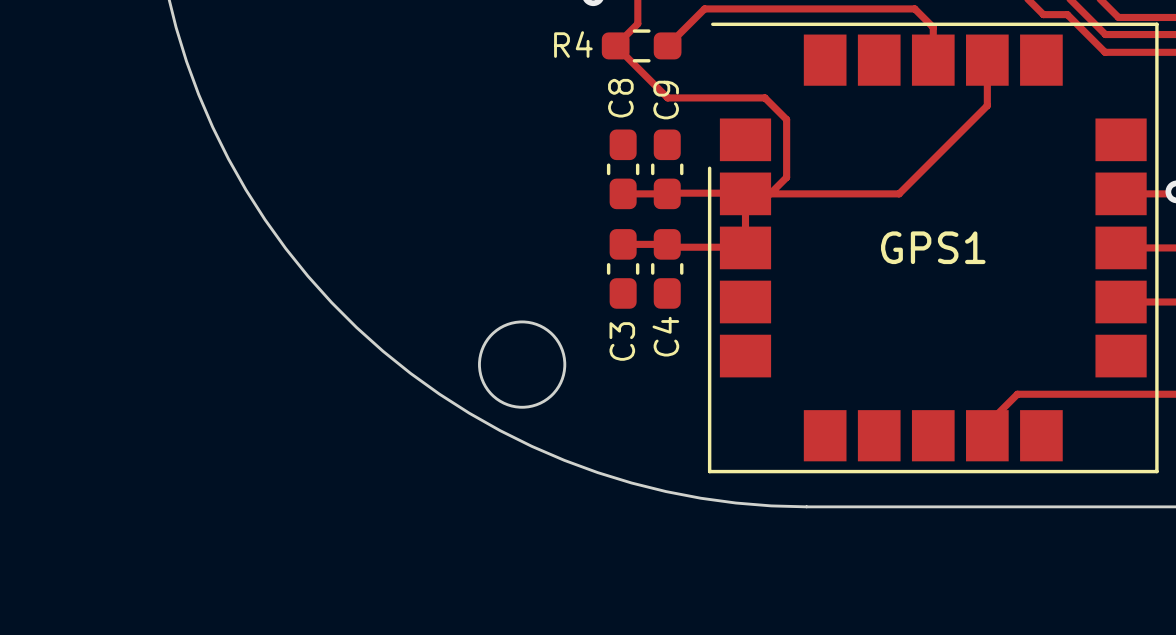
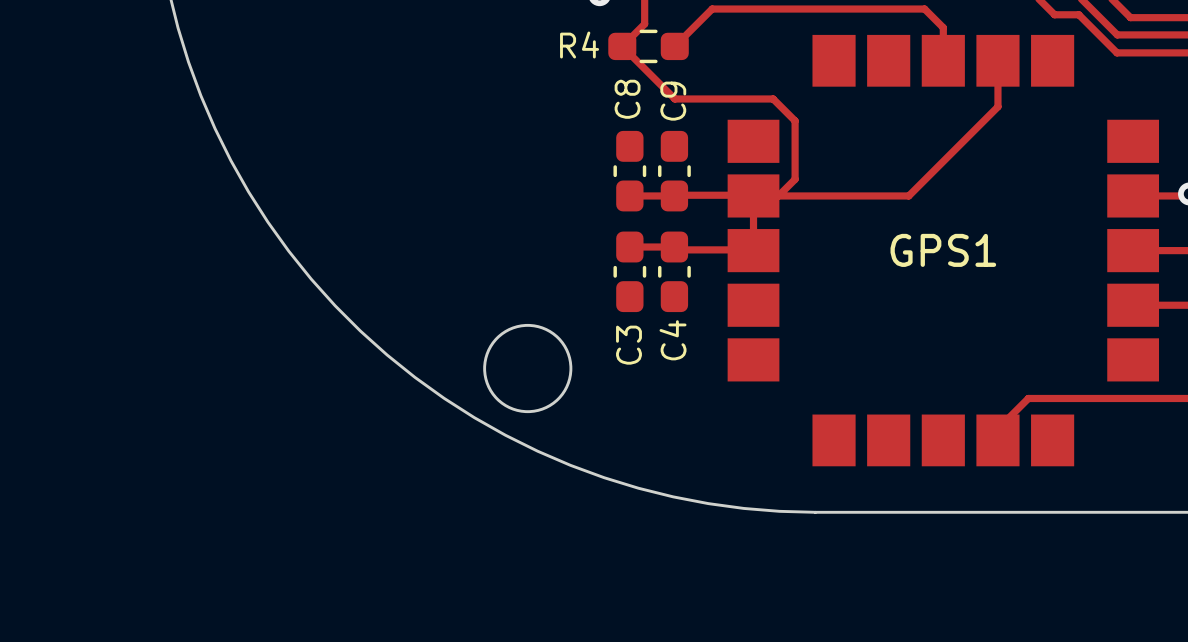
GPS1 footprint: [707, 22, 1159, 474] -> [727, 34, 1160, 467]

